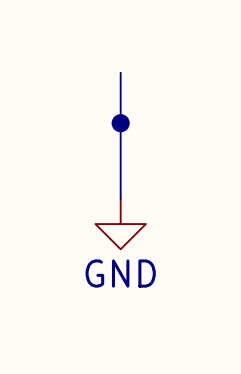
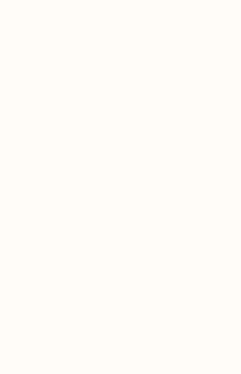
wire: (120, 72) (120, 198) -> none
junction: (120, 123) -> none
power symbol: GND (120, 224) -> none

